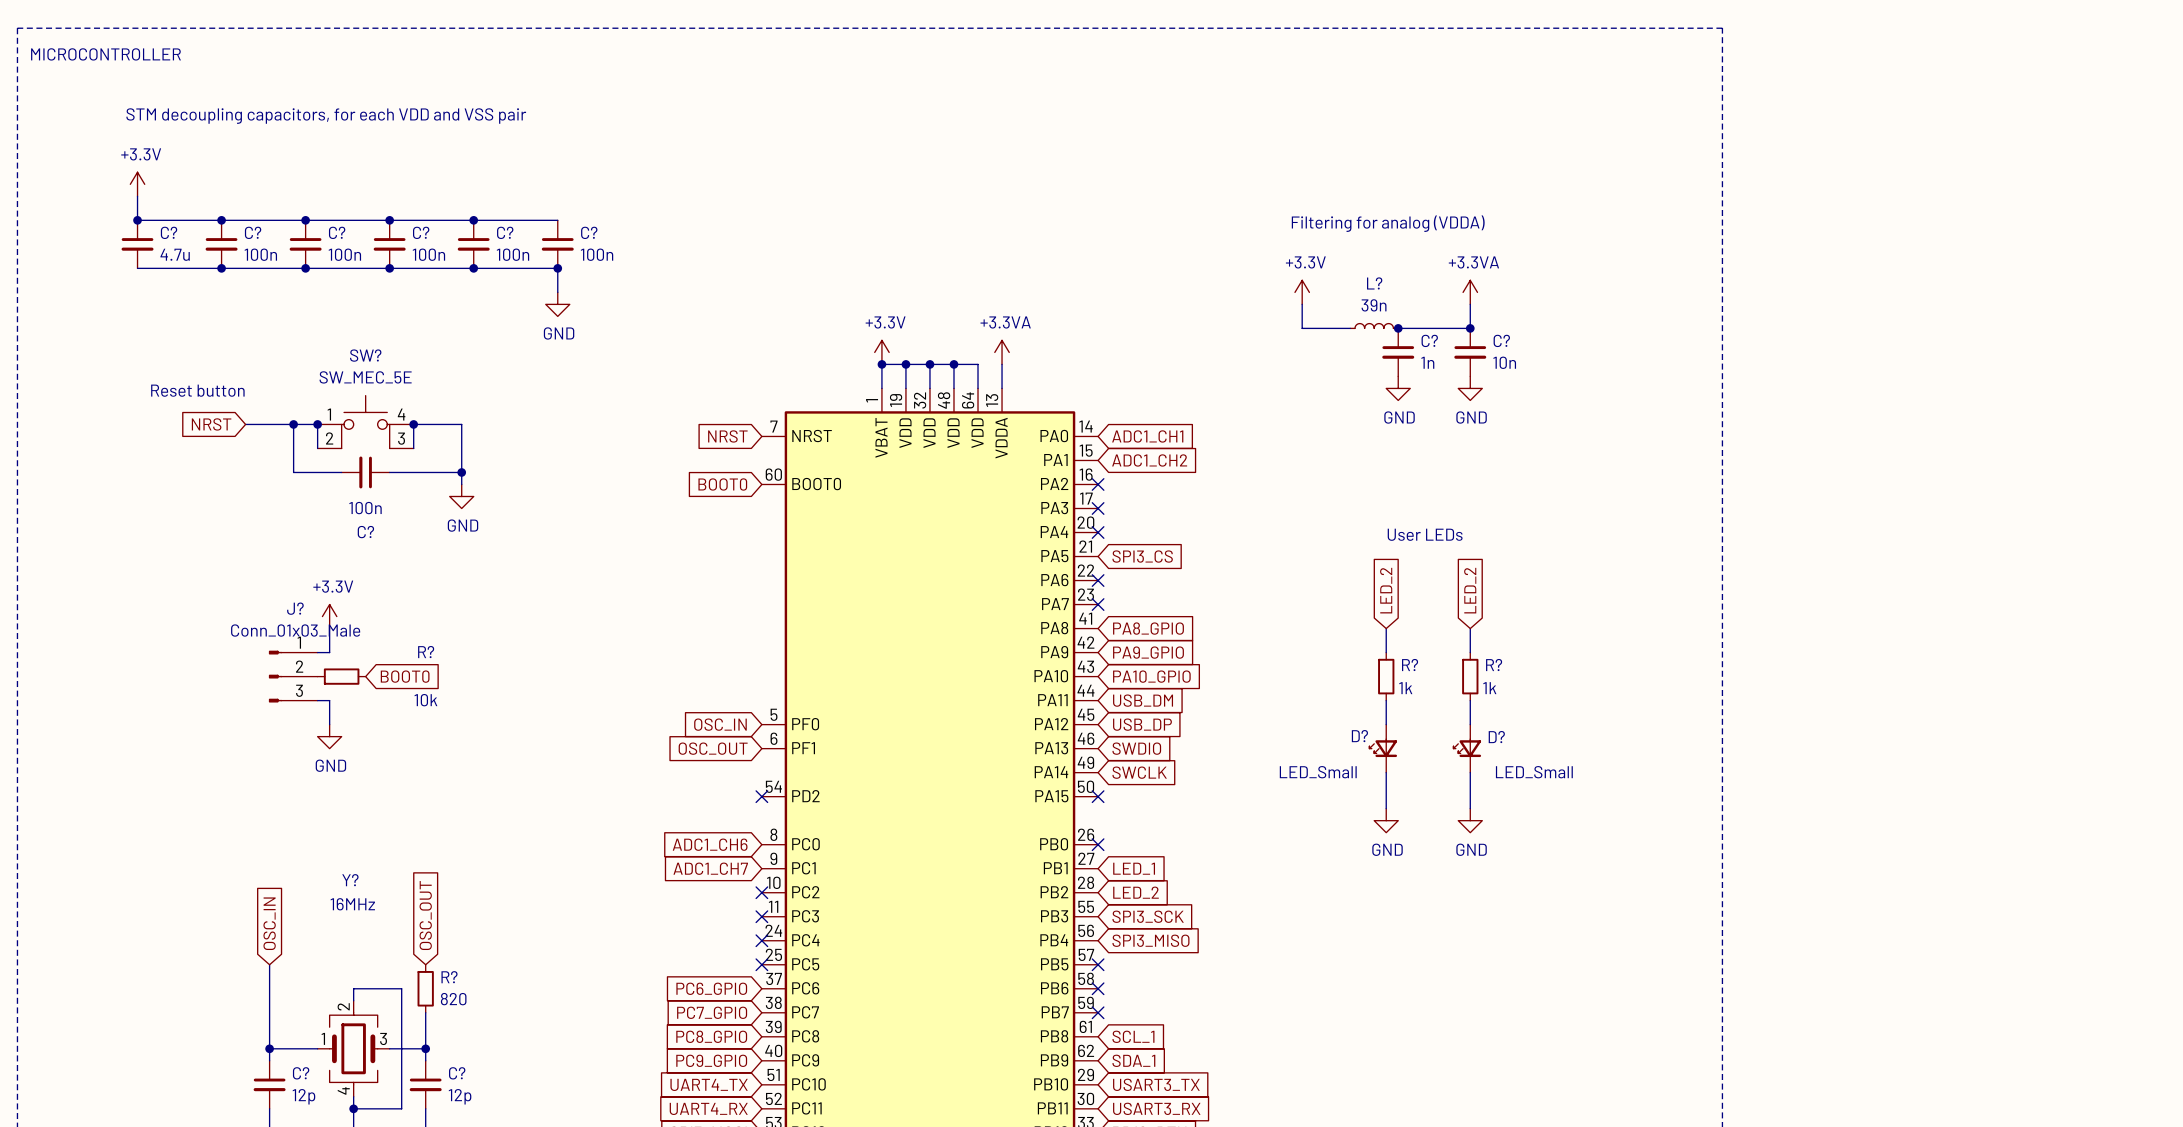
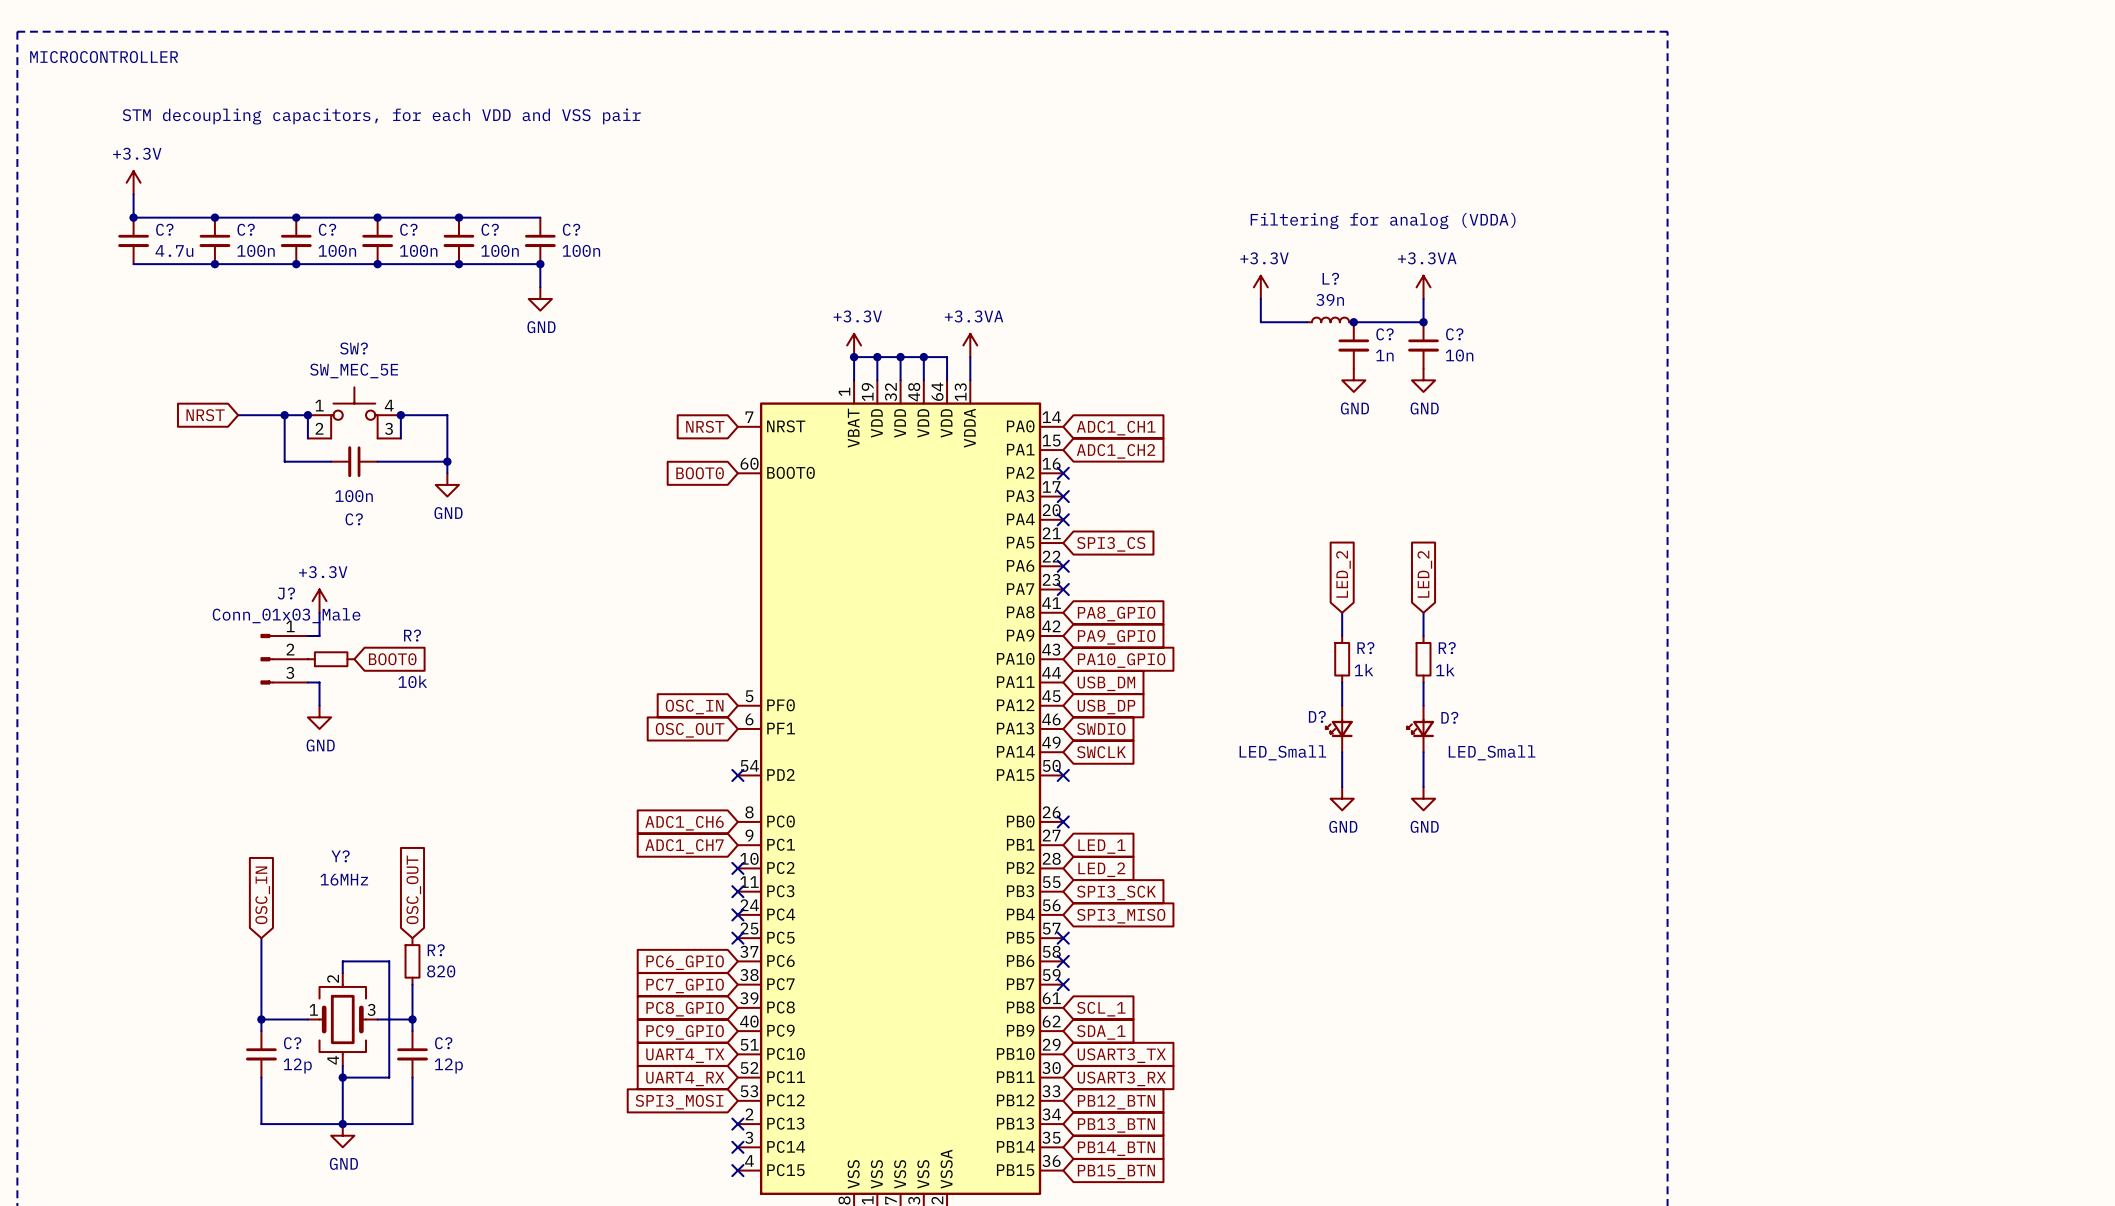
text: Reset button (197, 390) -> none
text: User LEDs (1425, 534) -> none

